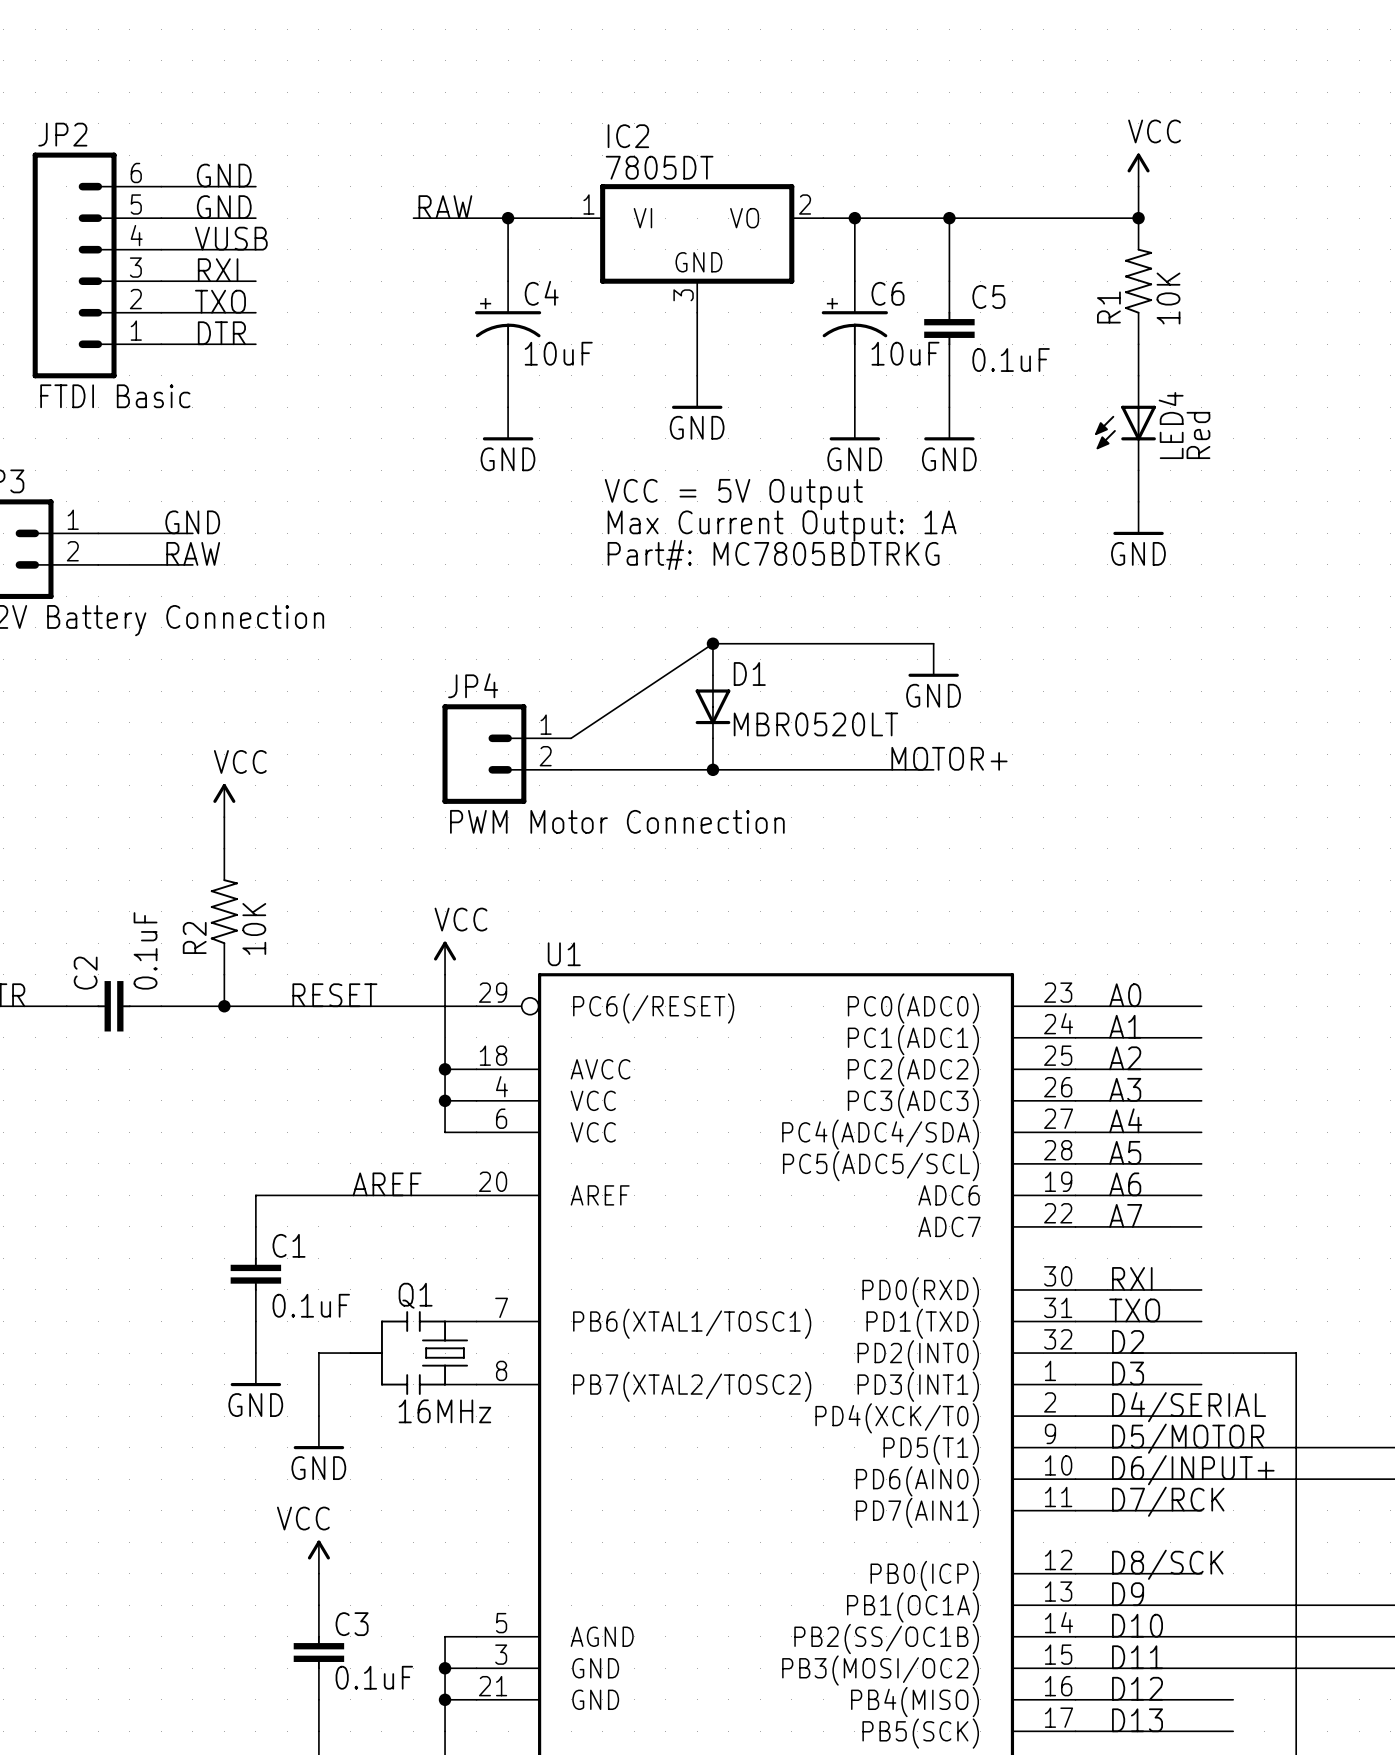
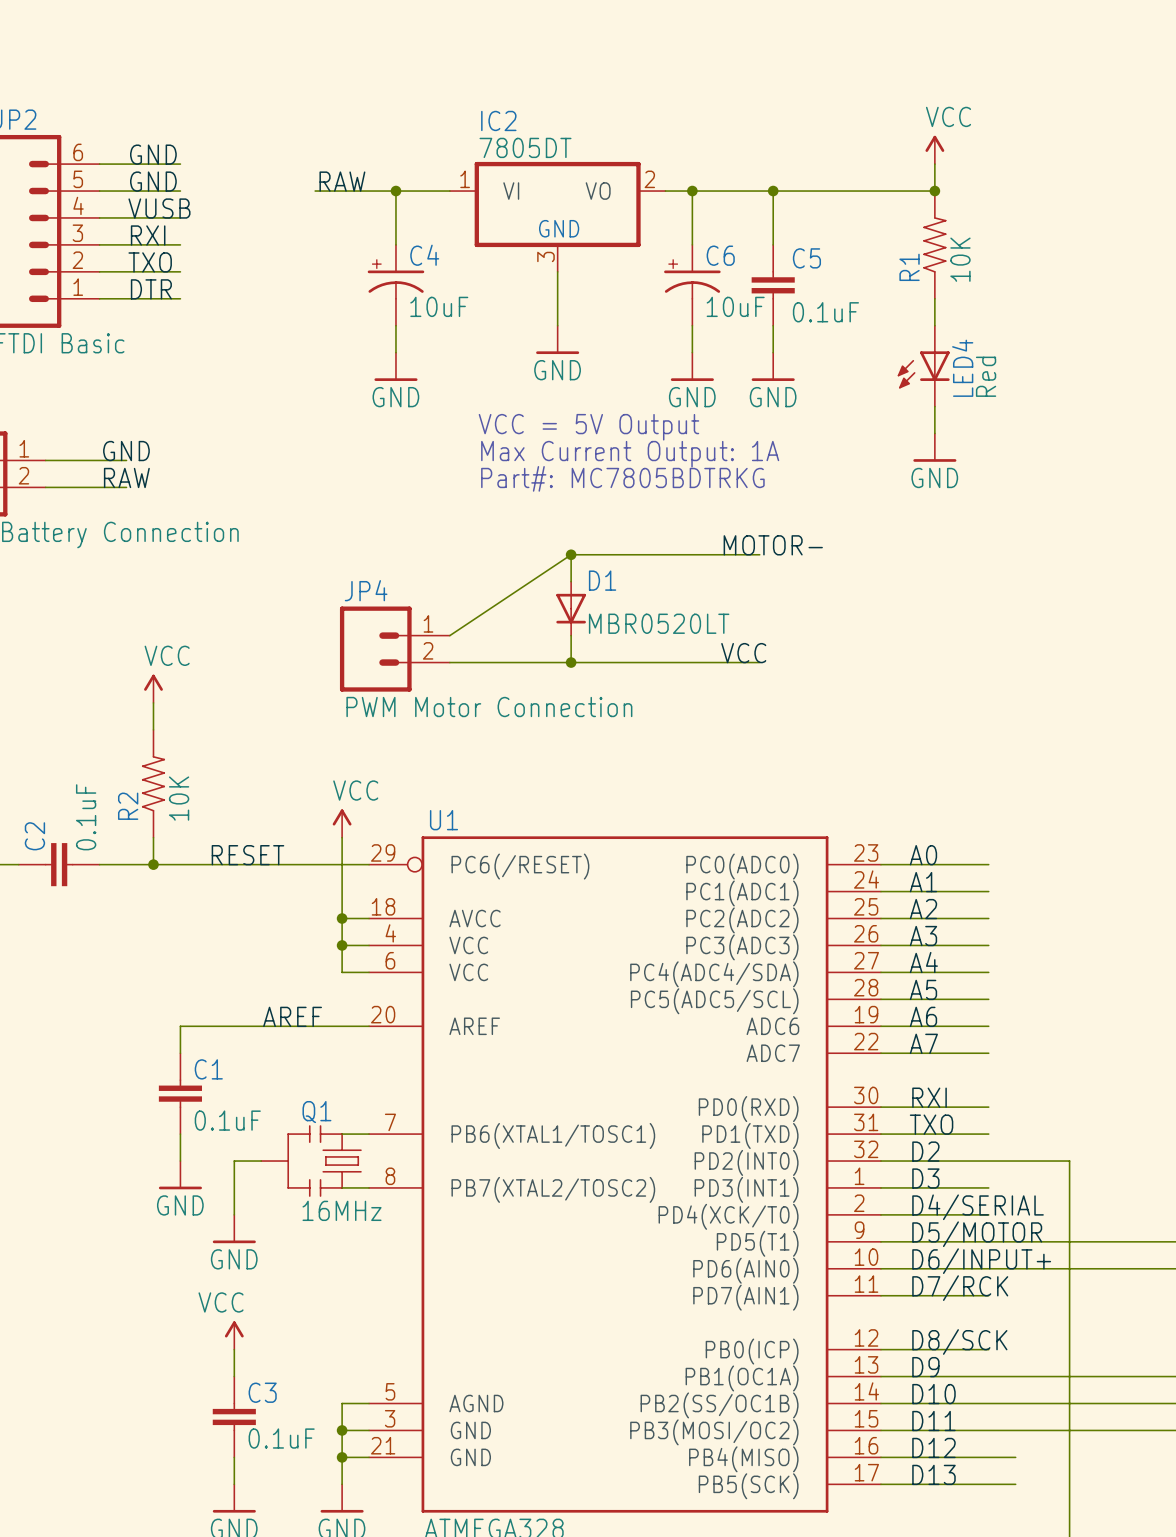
label: none -> MOTOR- (773, 545)
power symbol: GND (933, 660) -> none
label: MOTOR+ (949, 758) -> VCC (743, 653)

